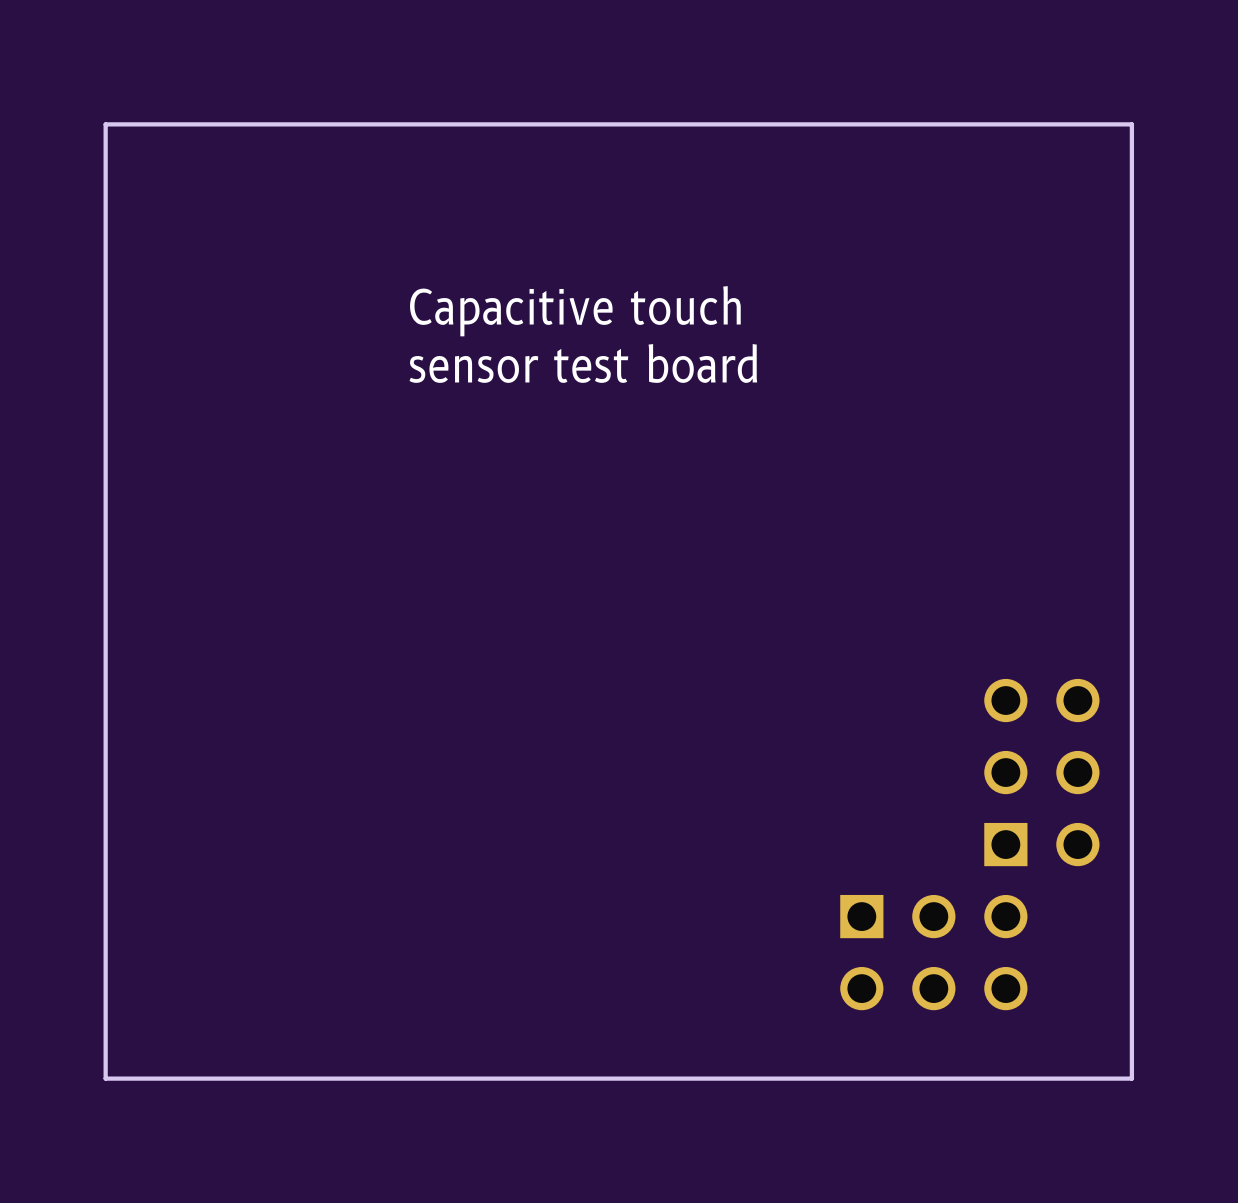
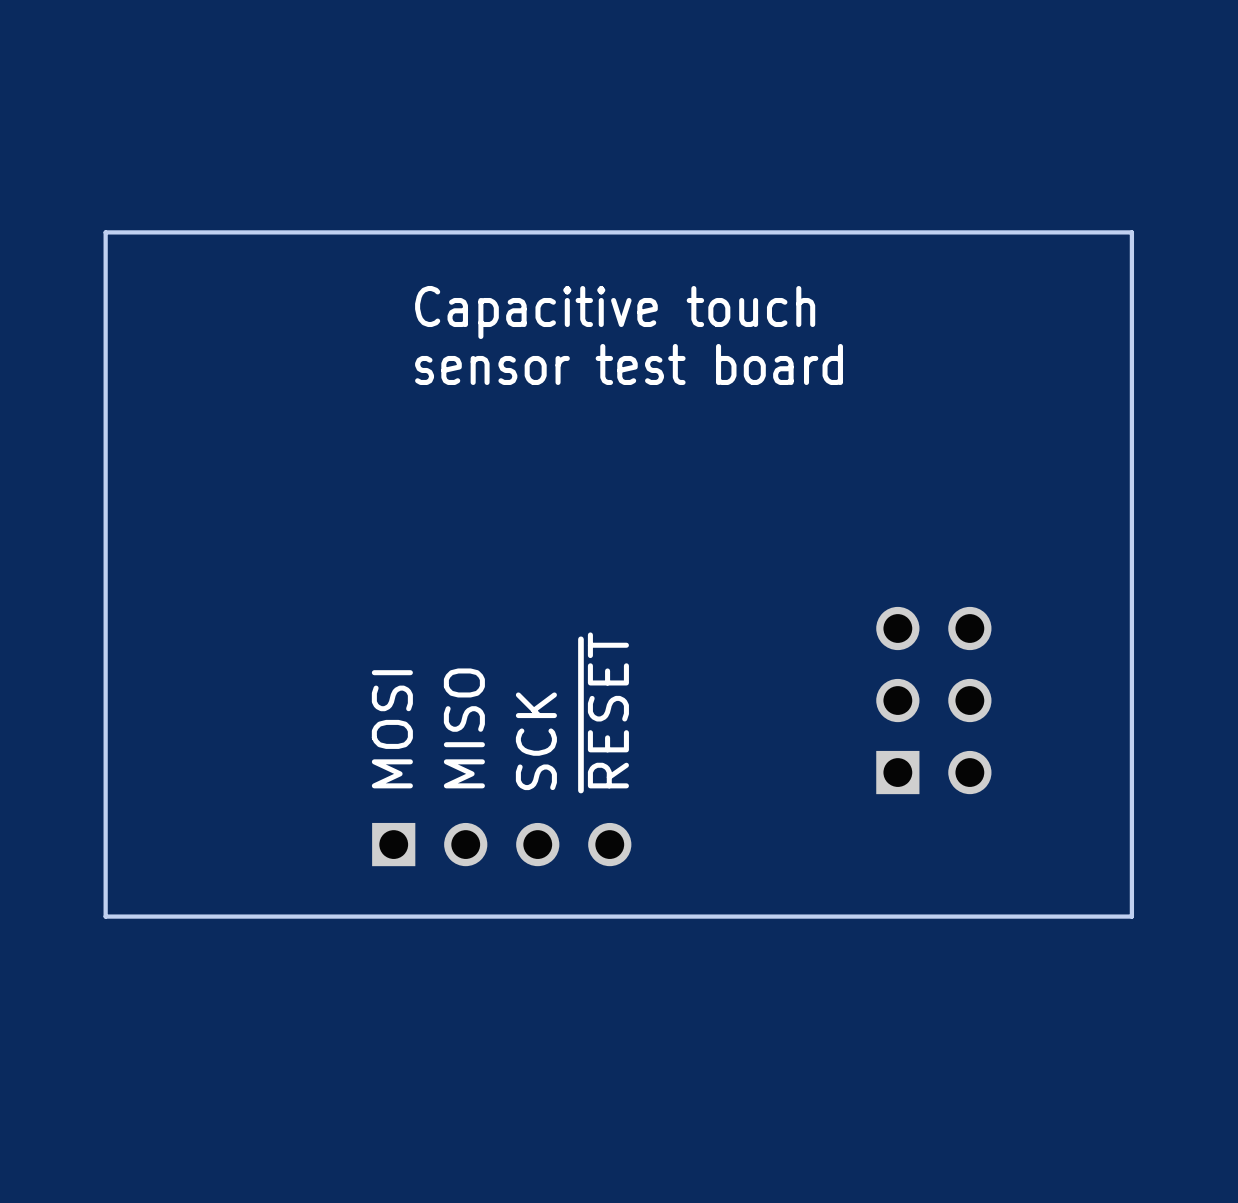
board edge: (1131, 232) (1131, 124) (105, 124) (105, 232) -> (1131, 232) (105, 232)
line: none -> (580, 639) (580, 790)
part: none -> (933, 700)
text: none -> RESET (608, 710)
text: none -> MISO (464, 728)
text: none -> MOSI (392, 729)
text: none -> SCK (536, 741)
part: (1041, 772) -> none
part: none -> (501, 844)
board edge: (1131, 916) (1131, 1078) (105, 1078) (105, 916) -> (1131, 916) (105, 916)
part: (933, 952) -> none

